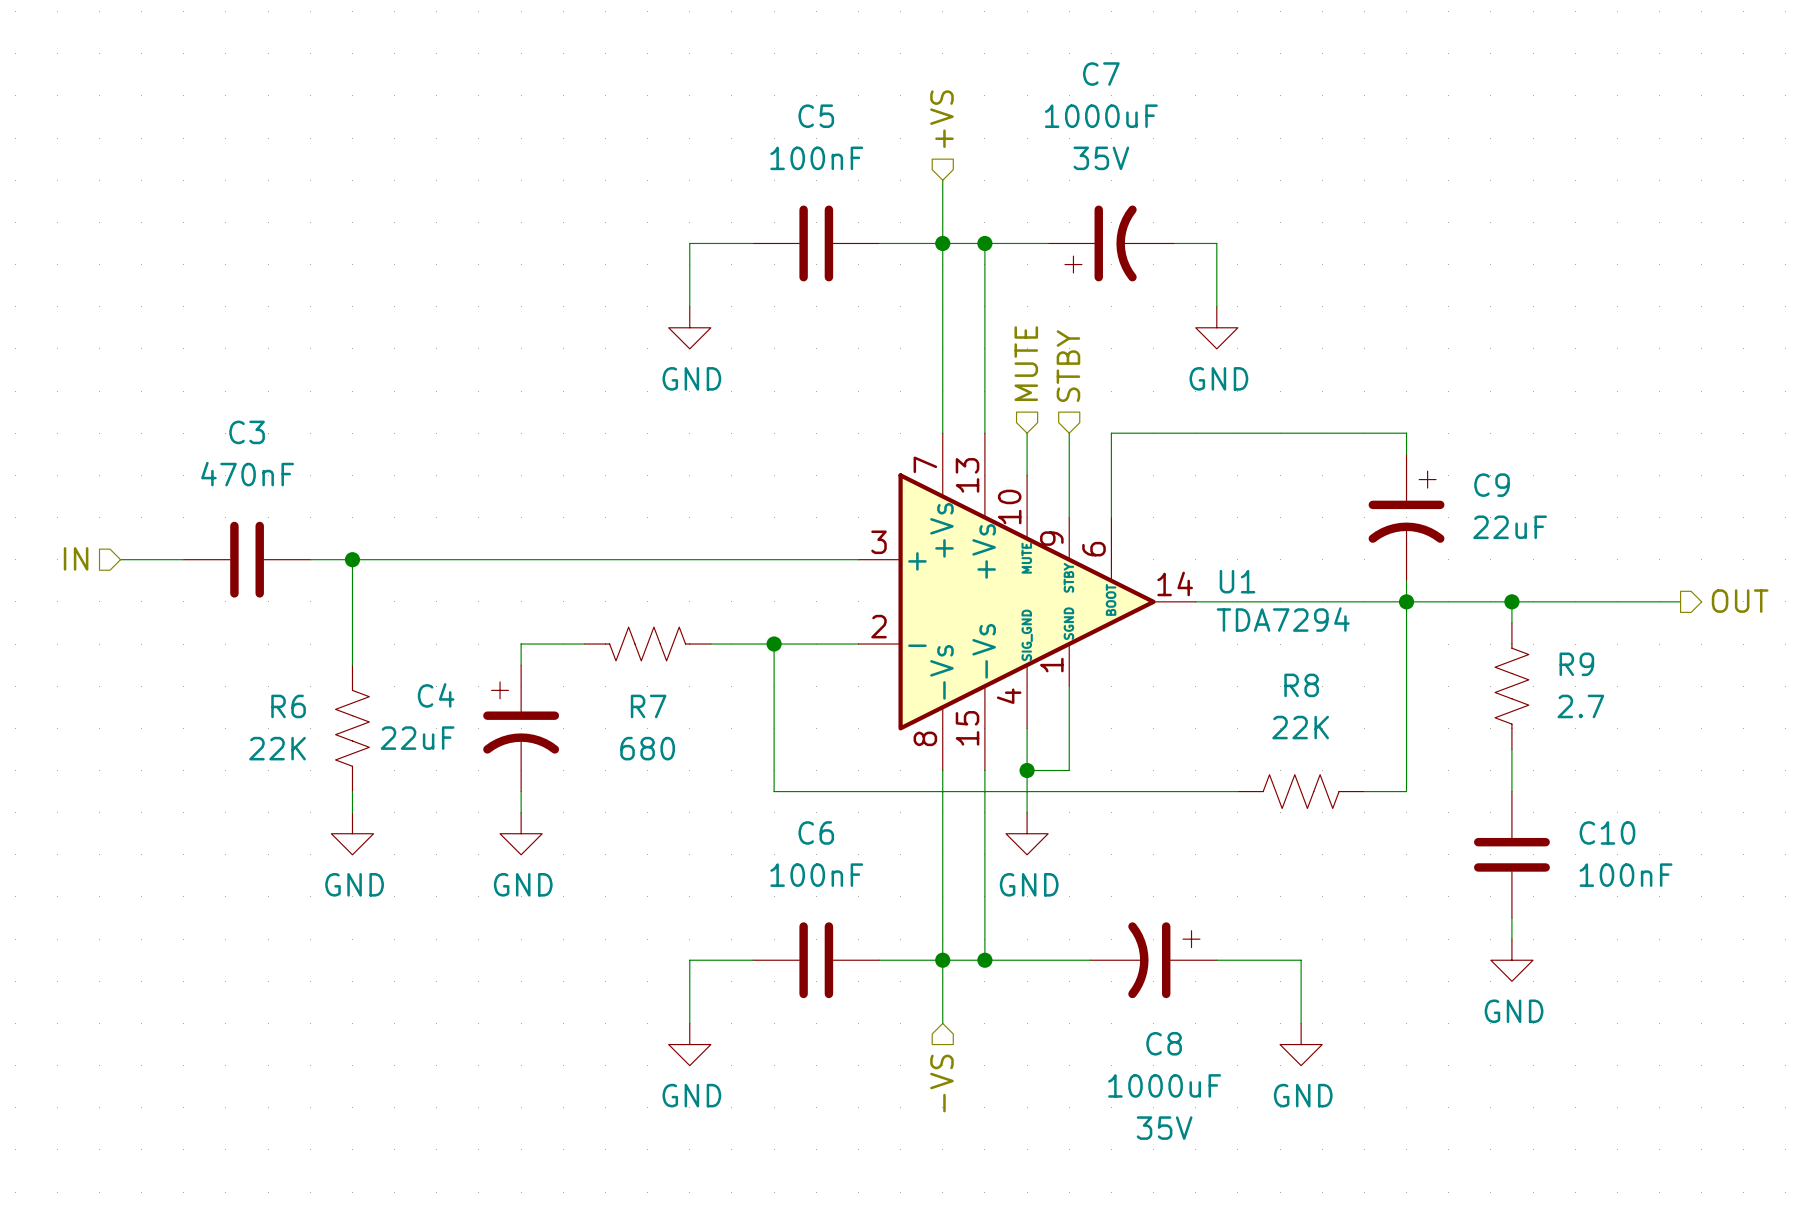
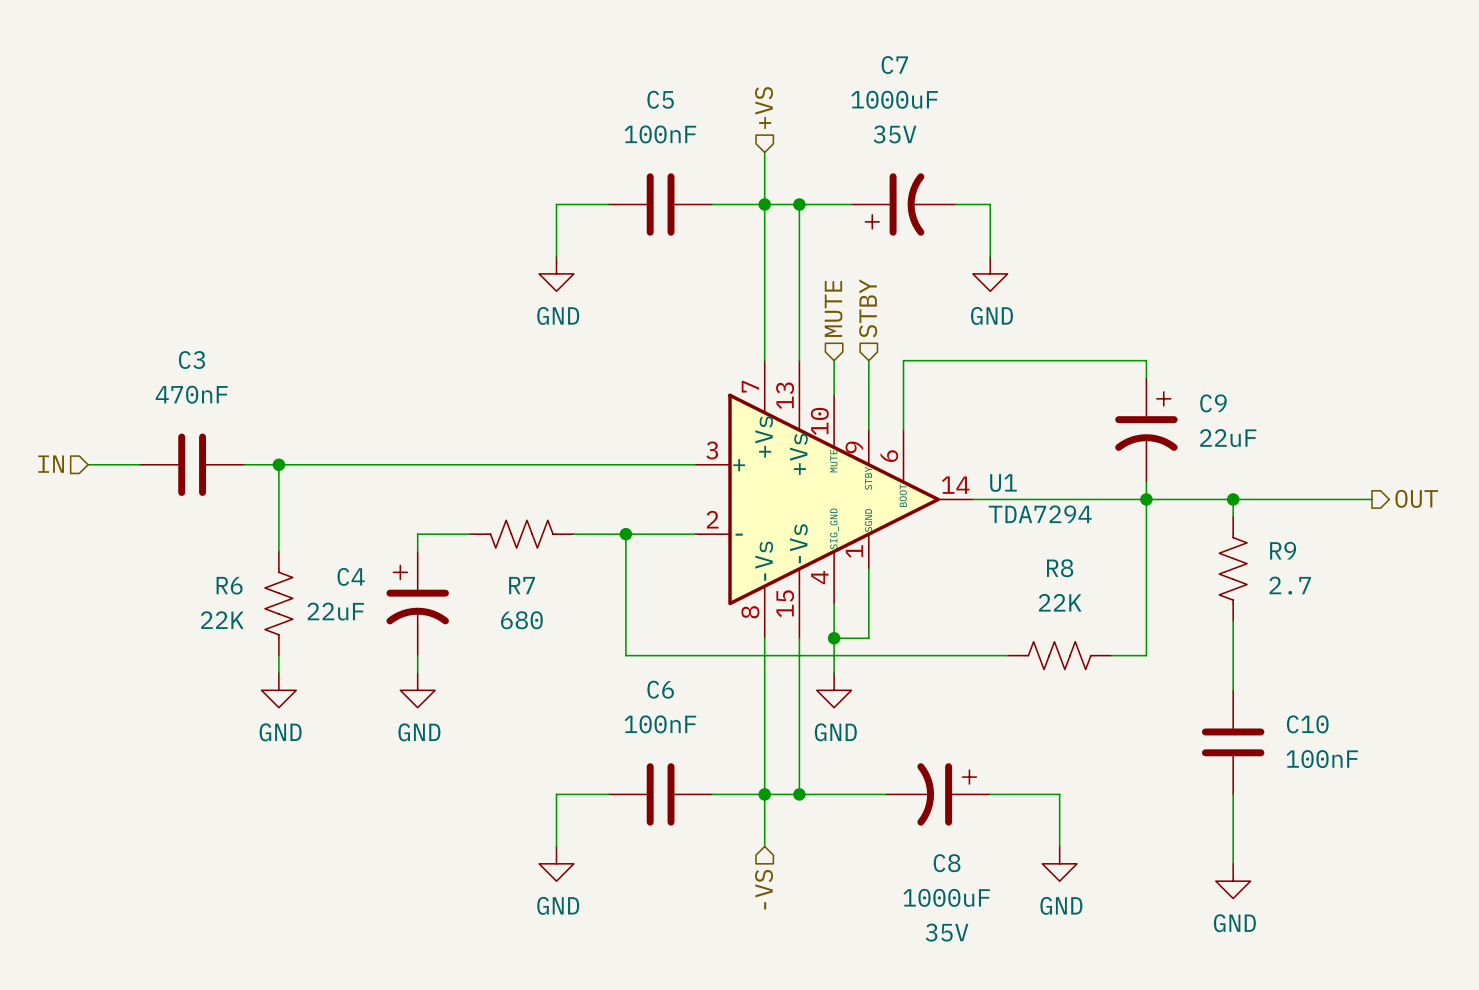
C10 position: (1511, 854) -> (1233, 742)
wire: none -> (1233, 794) (1233, 863)
power symbol position: GND (1511, 960) -> GND (1233, 881)

